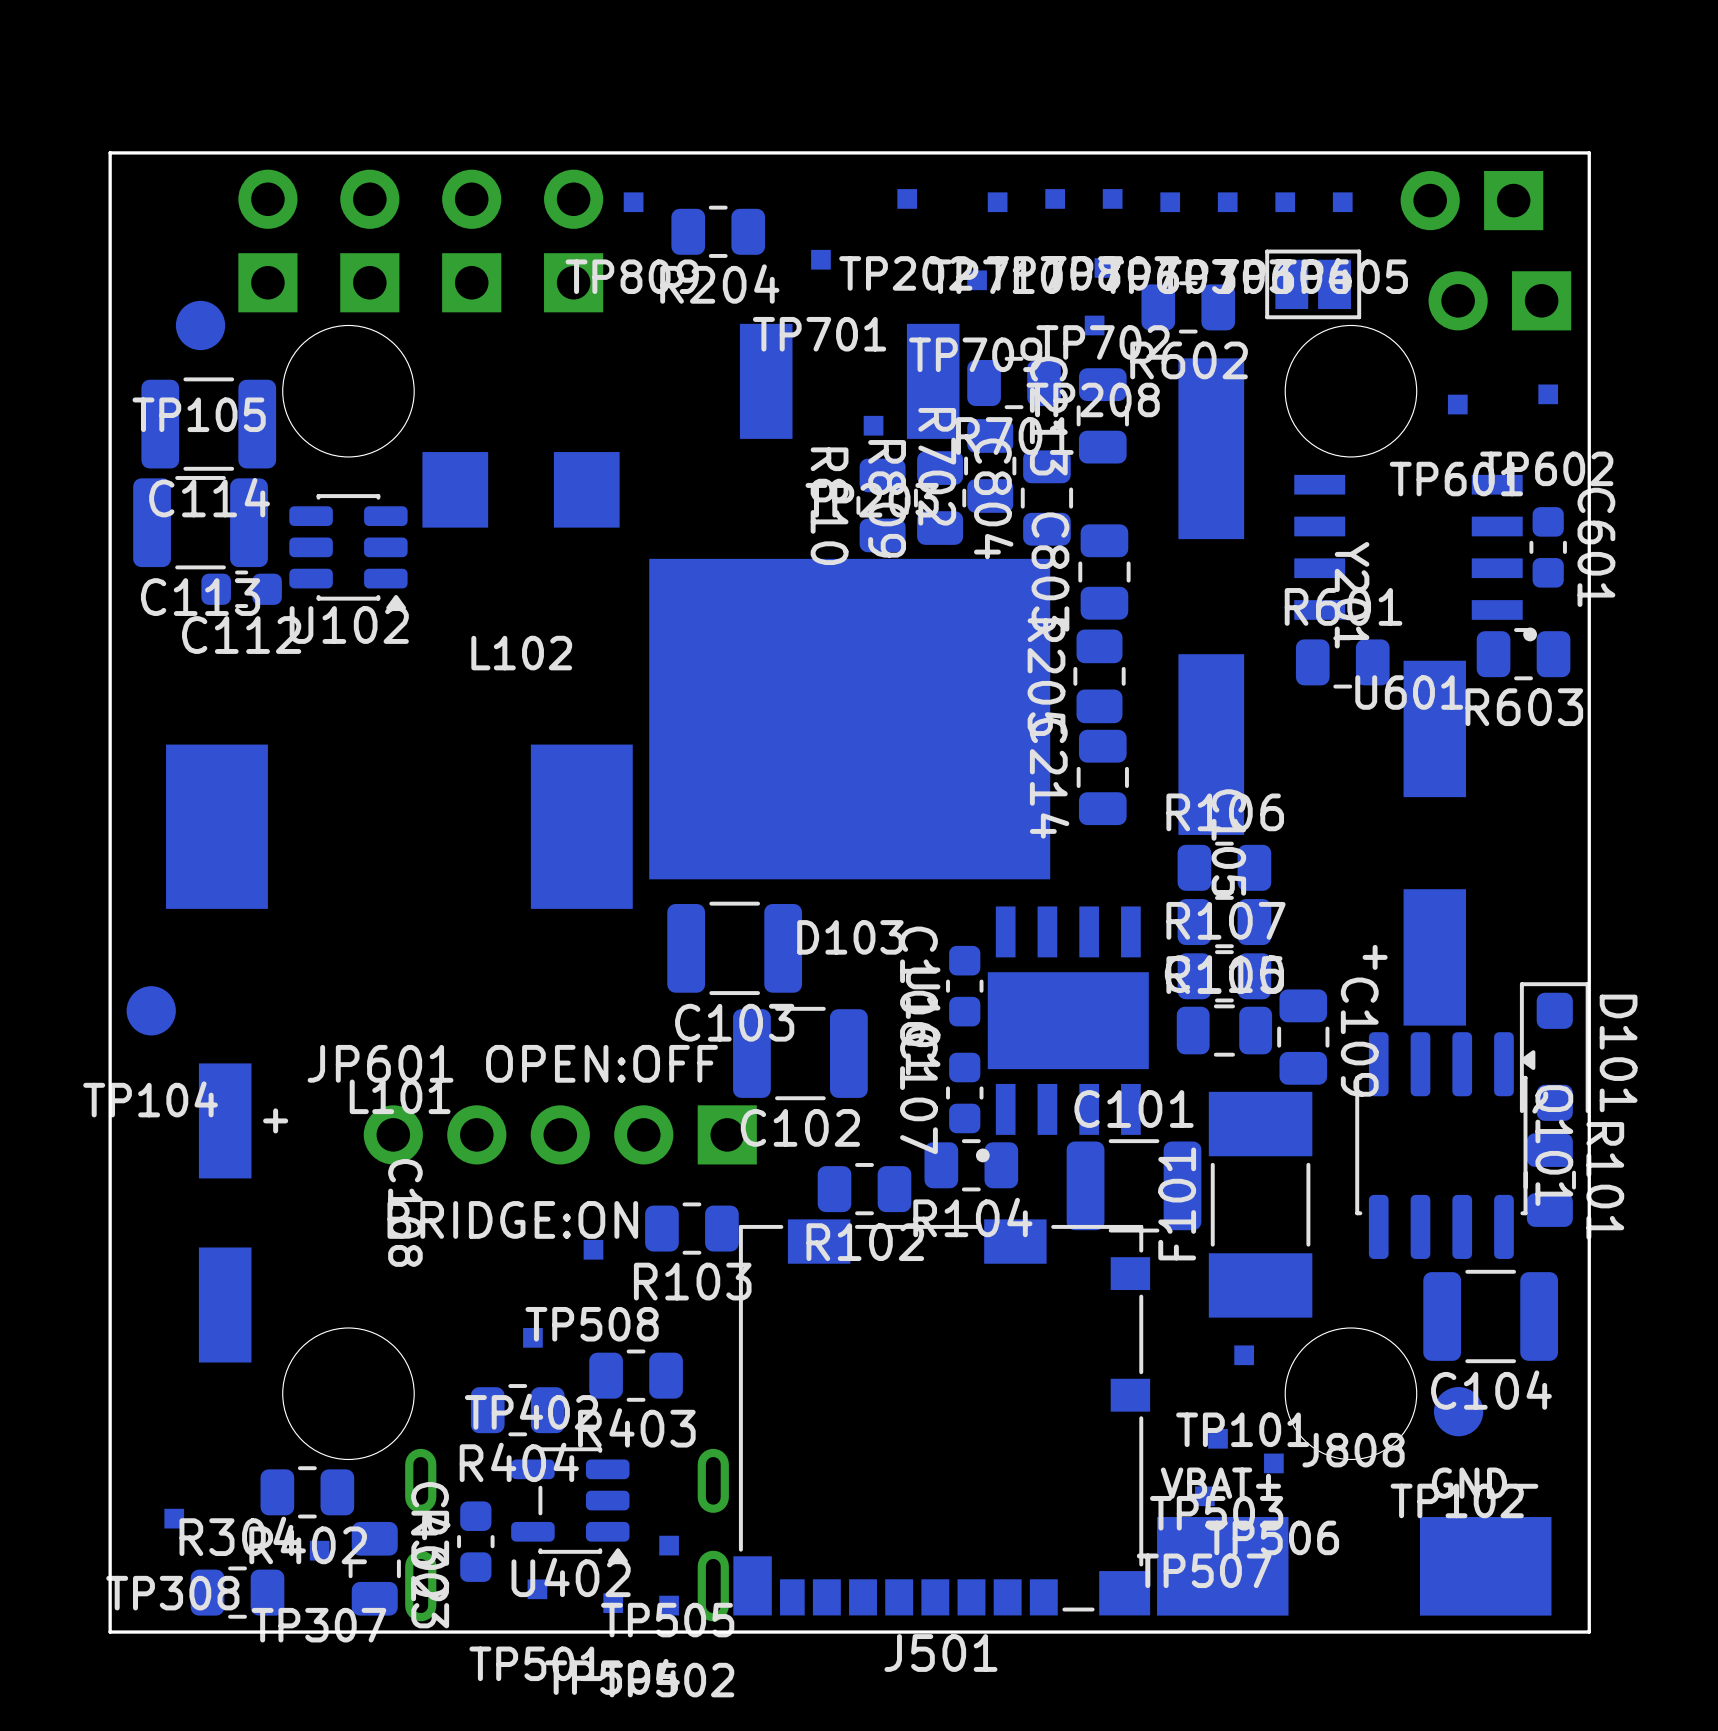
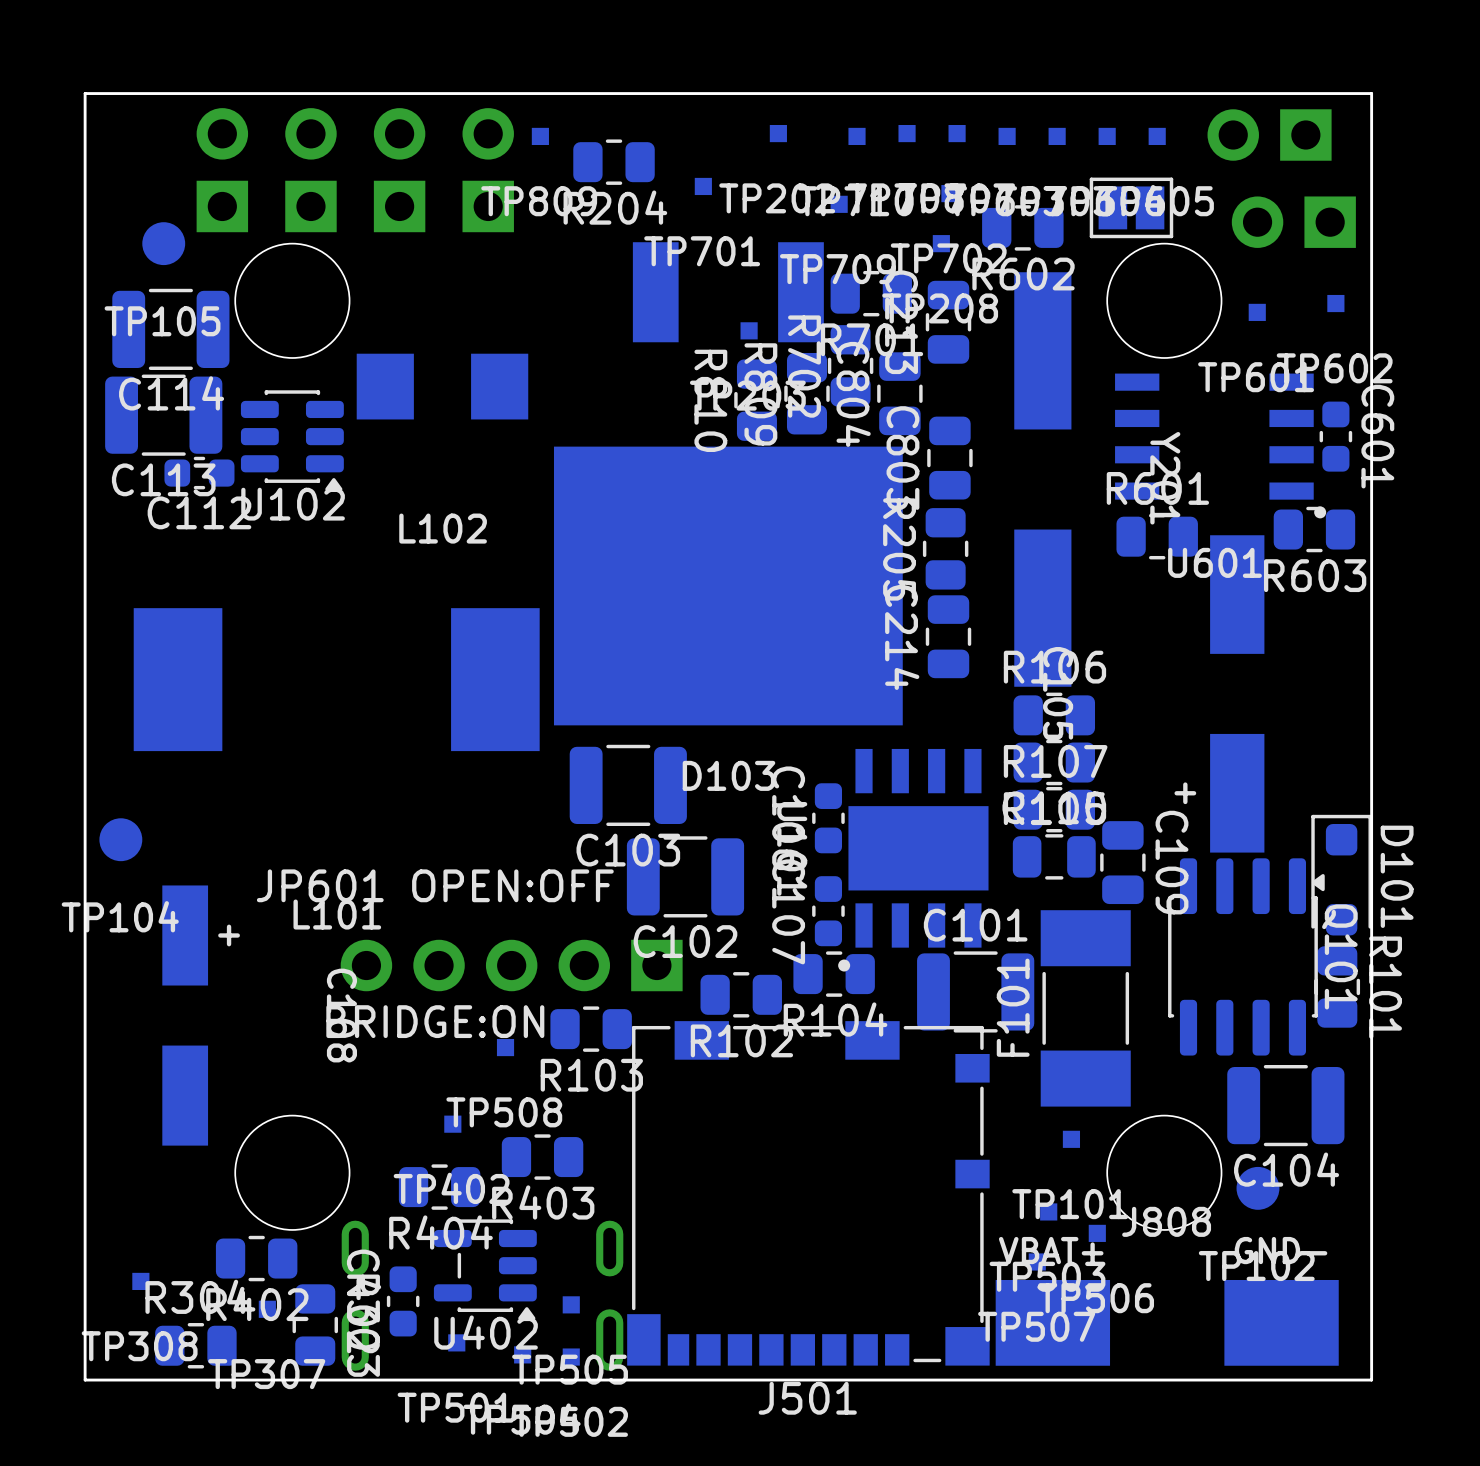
part position: (560, 1134) -> (511, 965)

